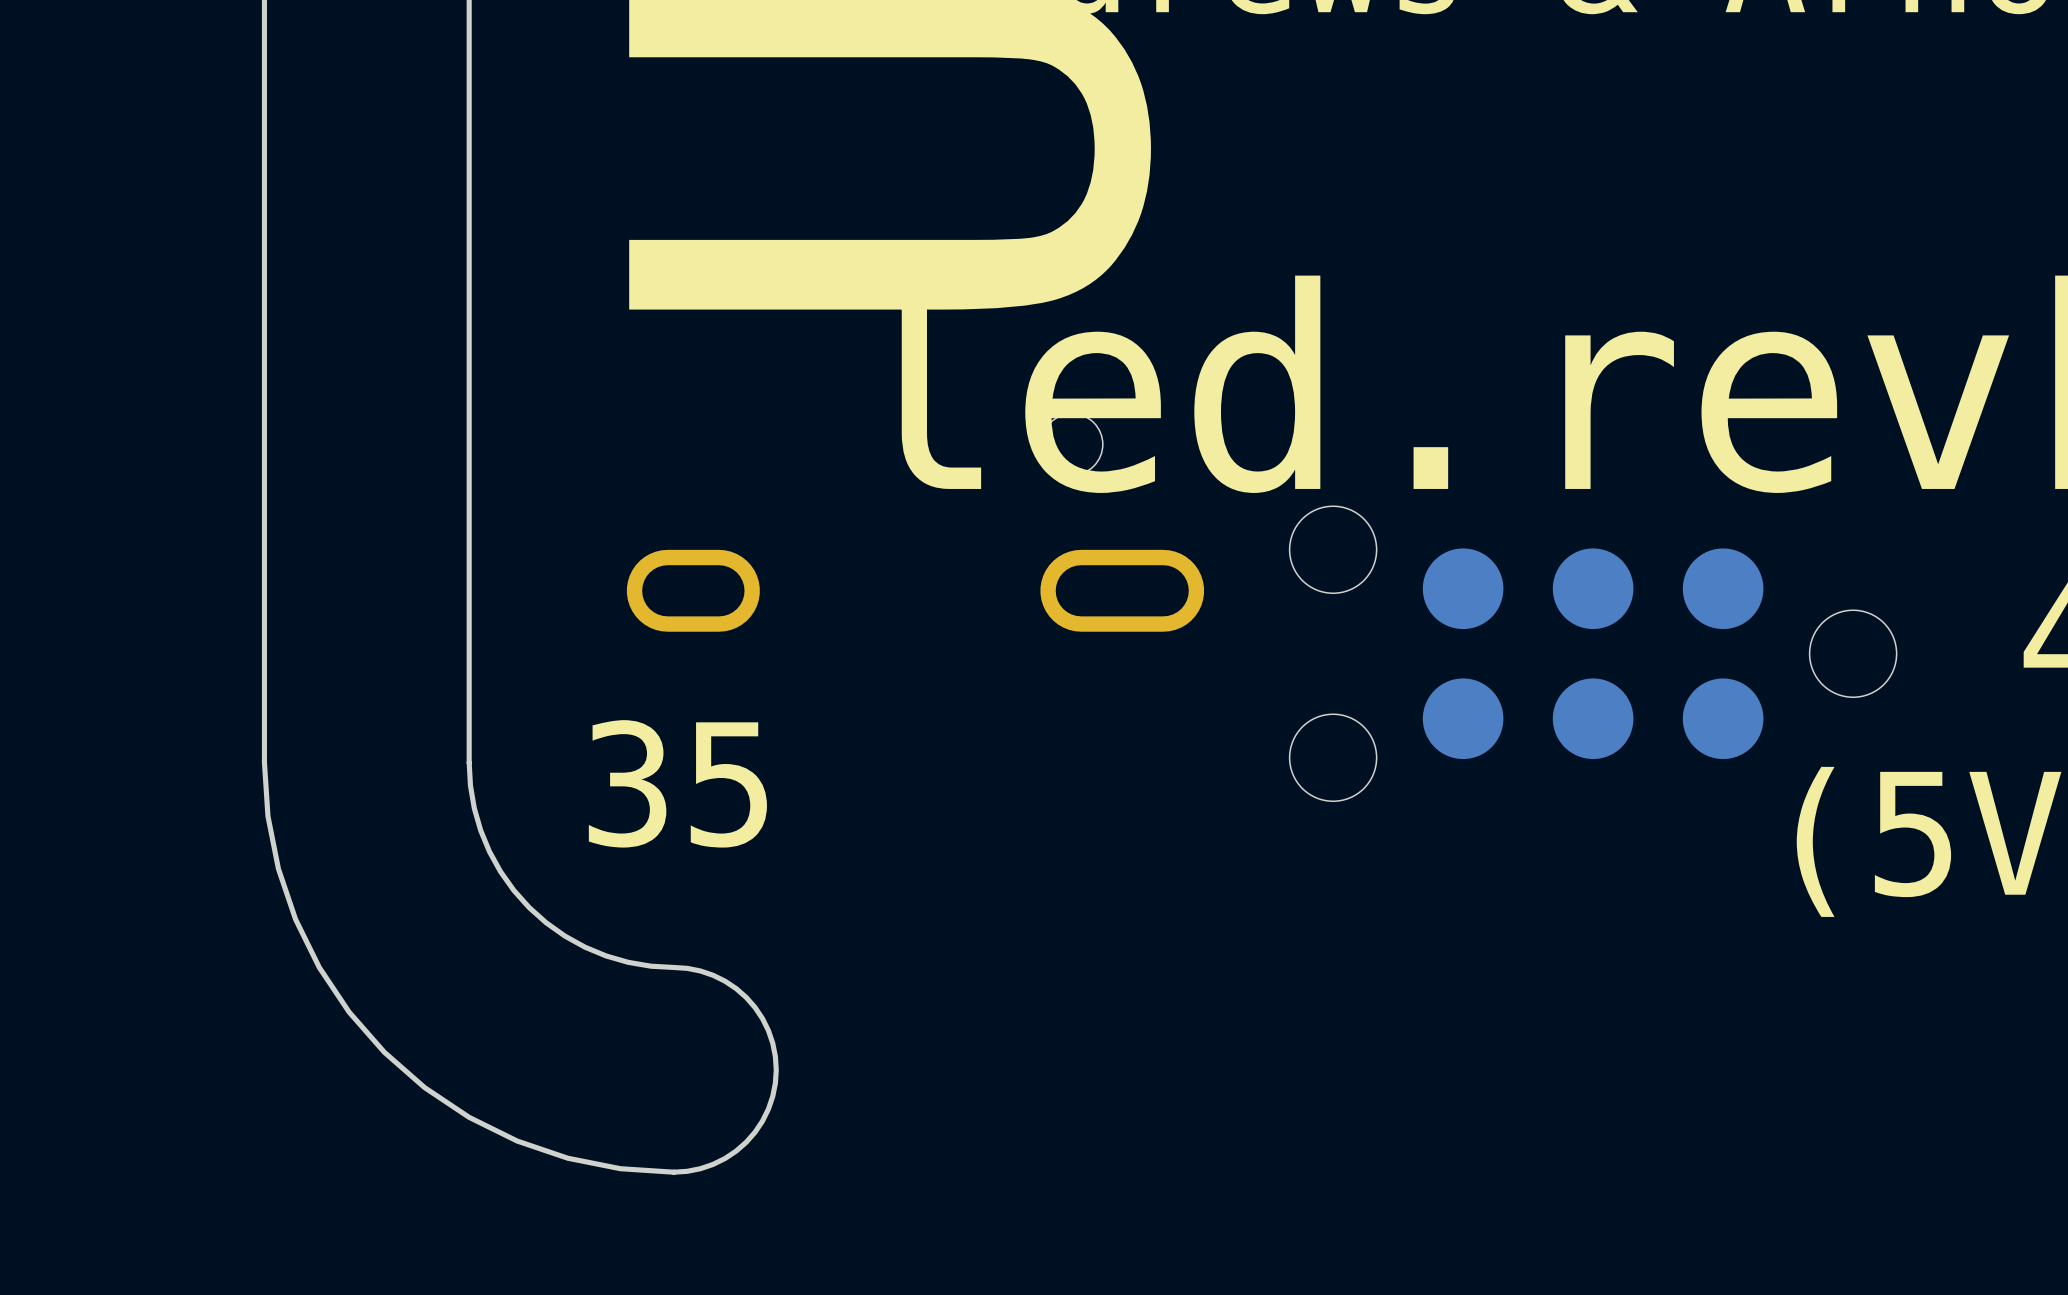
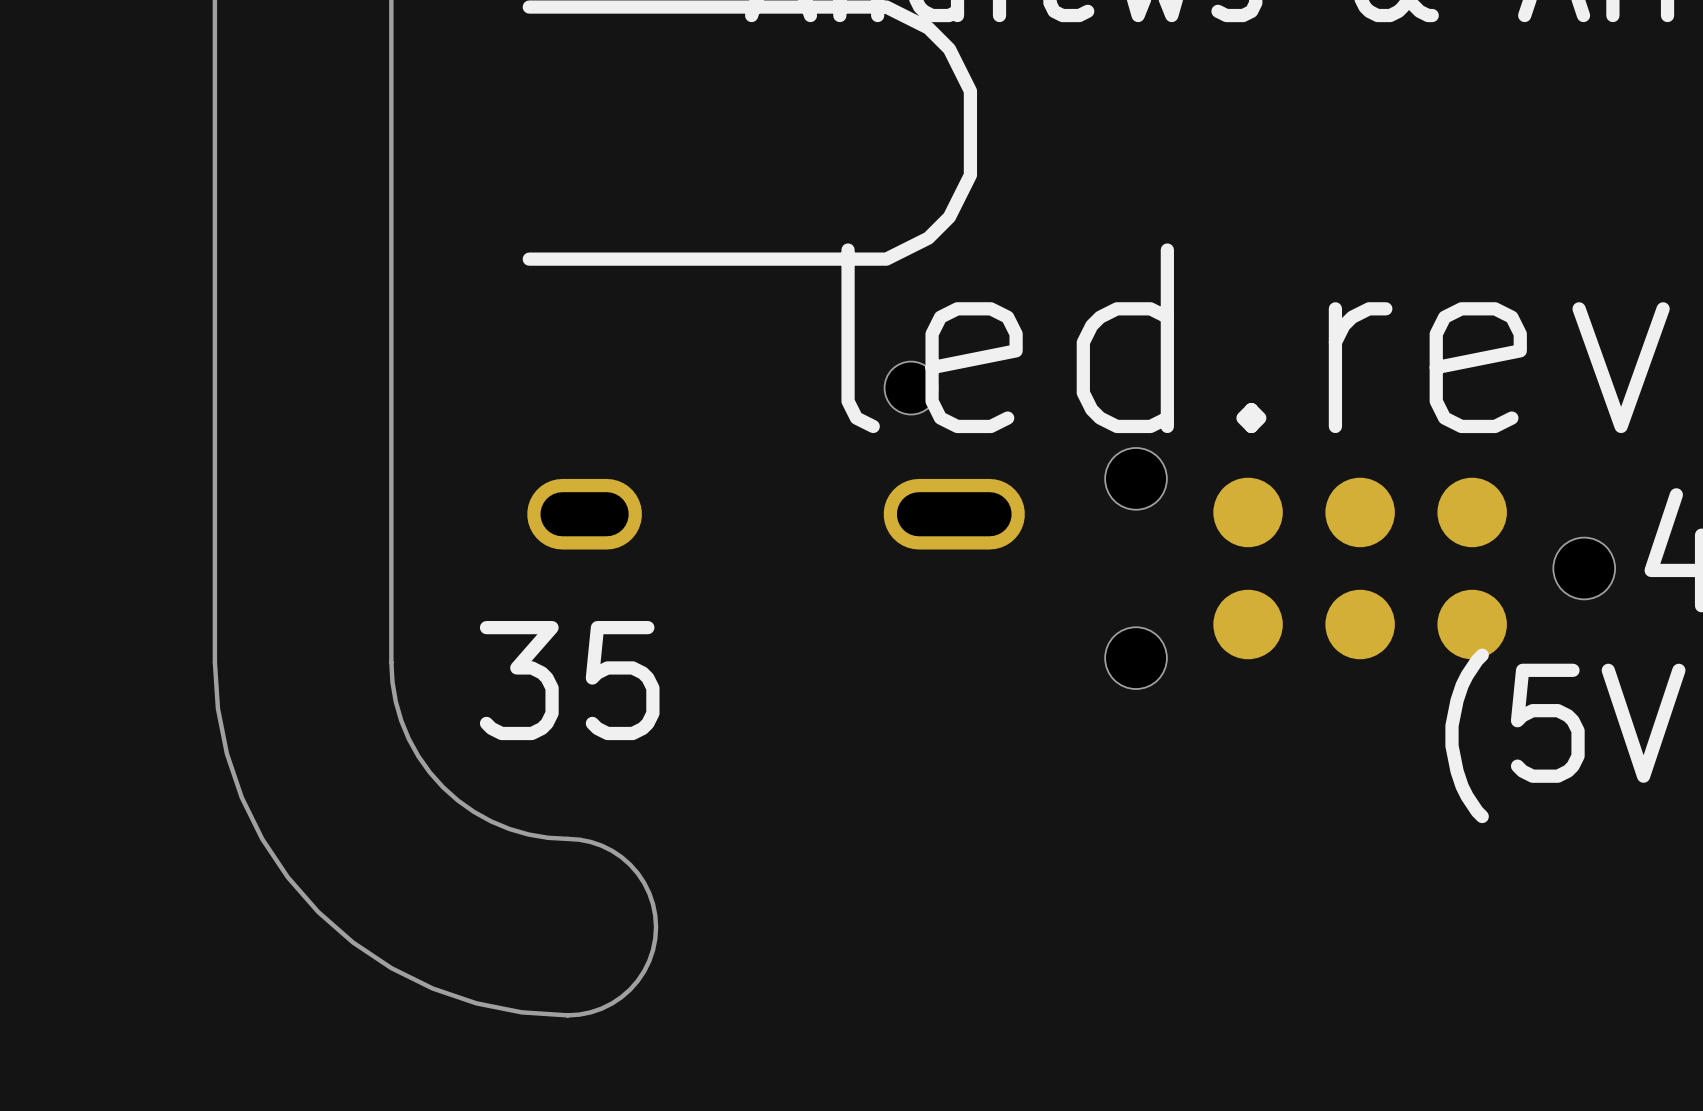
part footprint: [1289, 506, 1897, 802] -> [1105, 447, 1616, 690]

